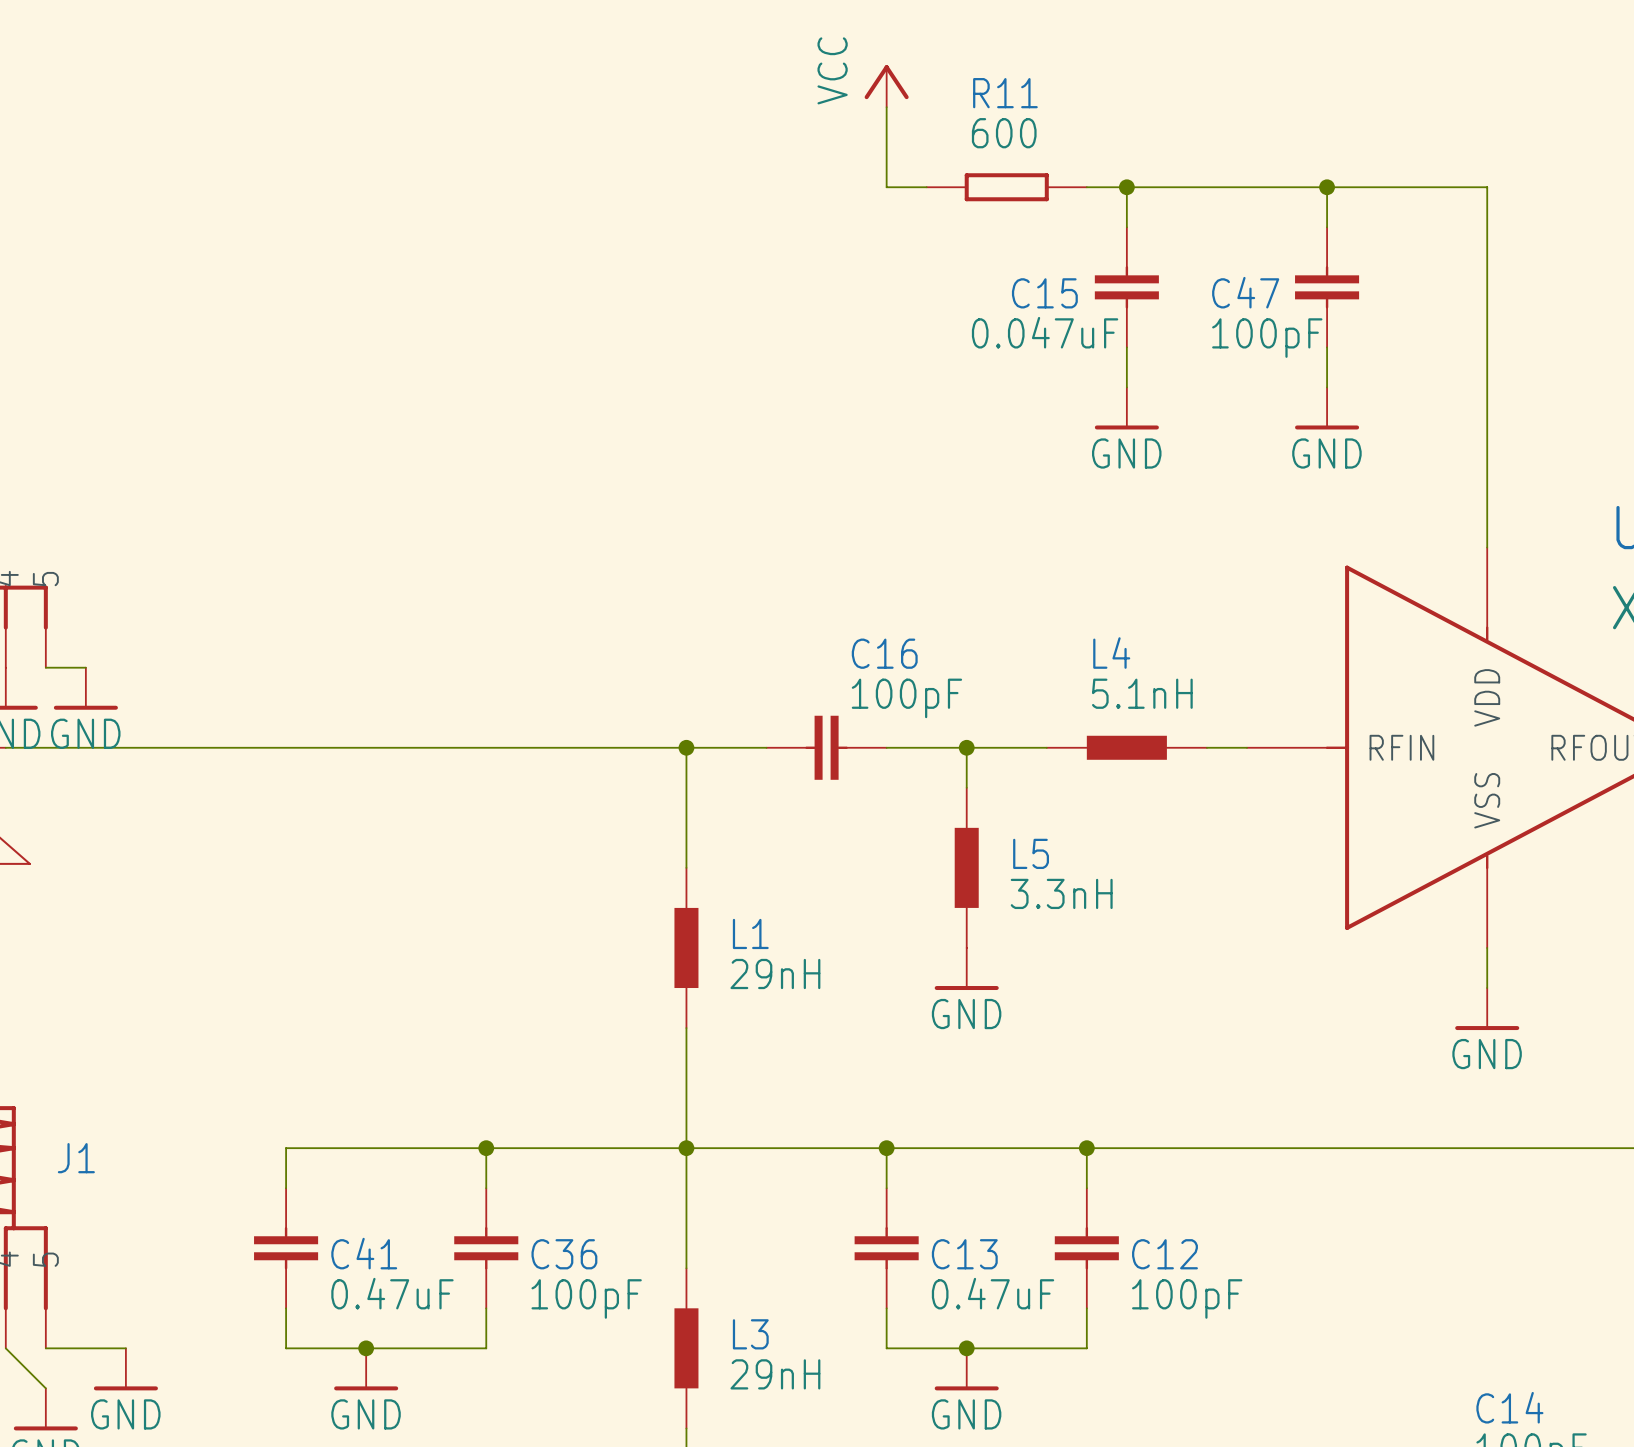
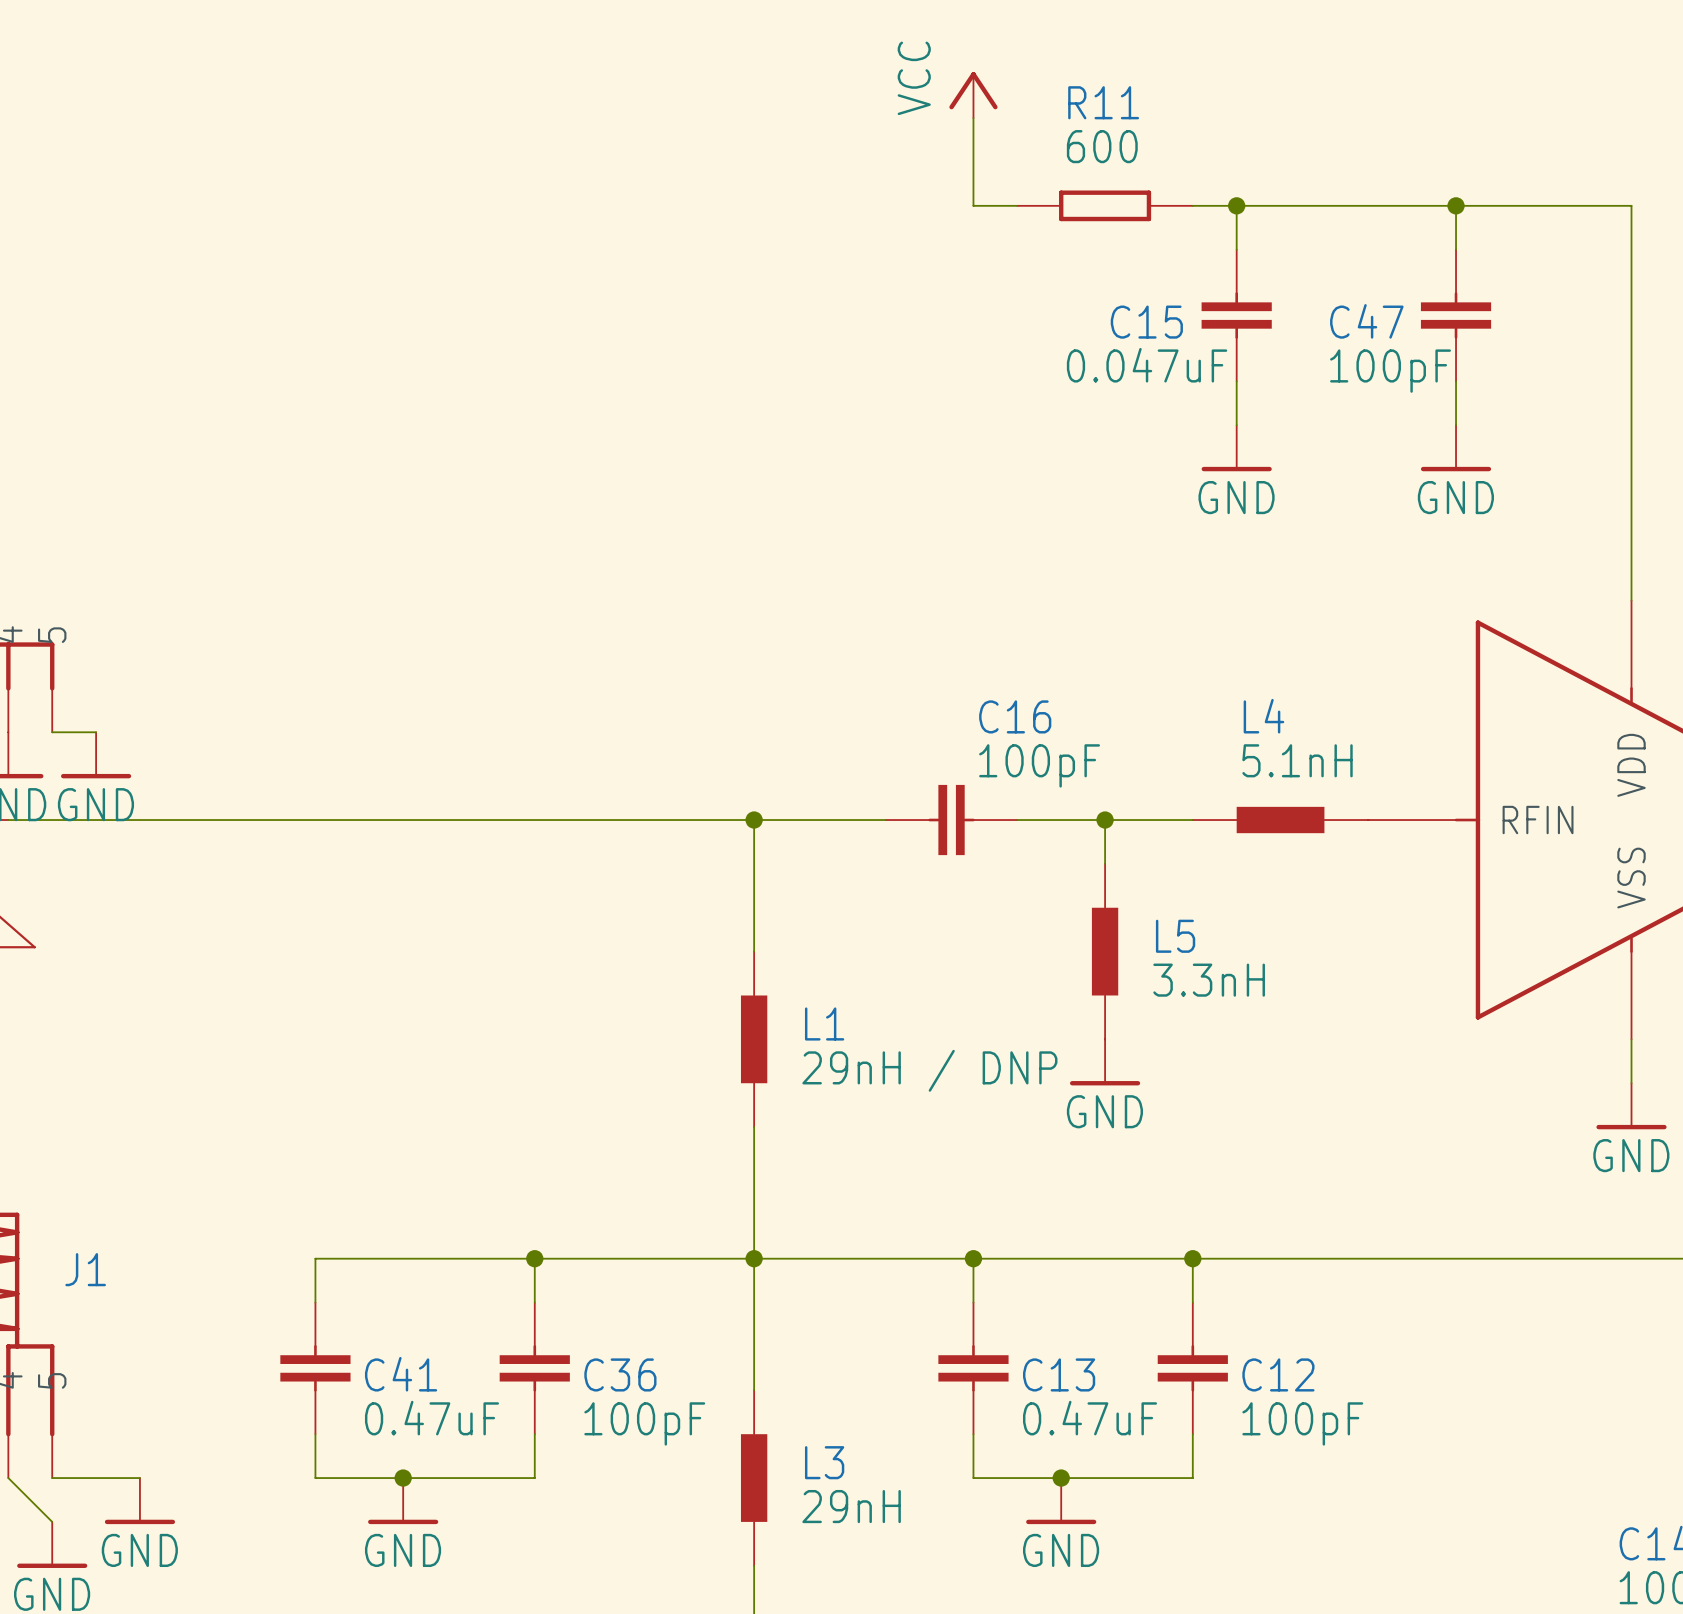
C16 position: (826, 747) -> (951, 820)
wire: (966, 747) (966, 787) -> (1105, 820) (1105, 863)
junction position: (966, 747) -> (1105, 820)
L4 position: (1126, 747) -> (1280, 820)
L5 position: (966, 867) -> (1105, 951)
power symbol position: GND (966, 968) -> GND (1105, 1062)
L1 value: 29nH (775, 973) -> 29nH / DNP (929, 1070)

